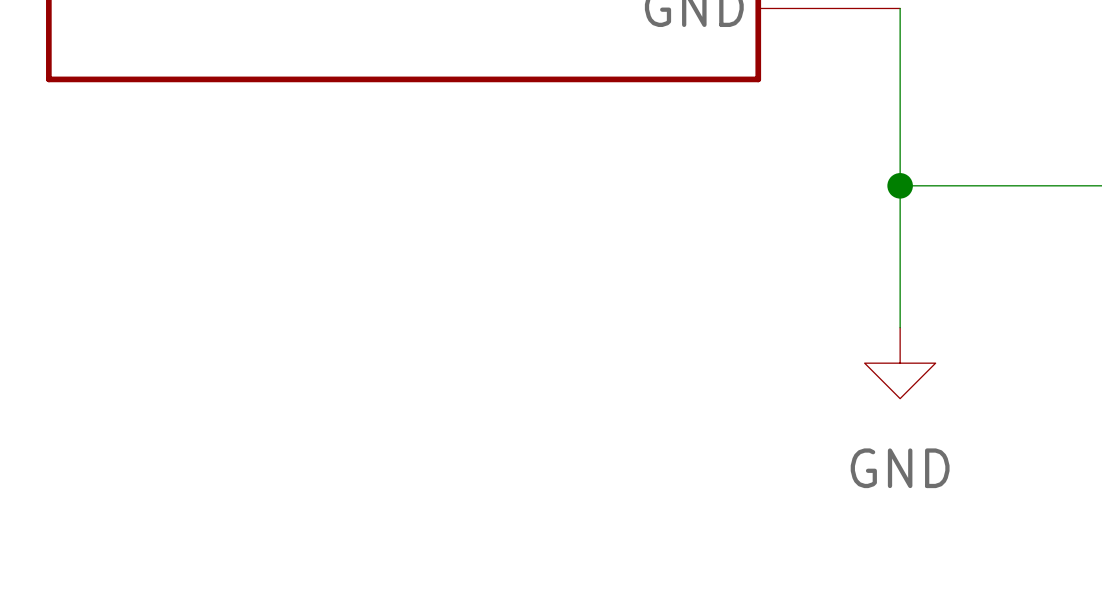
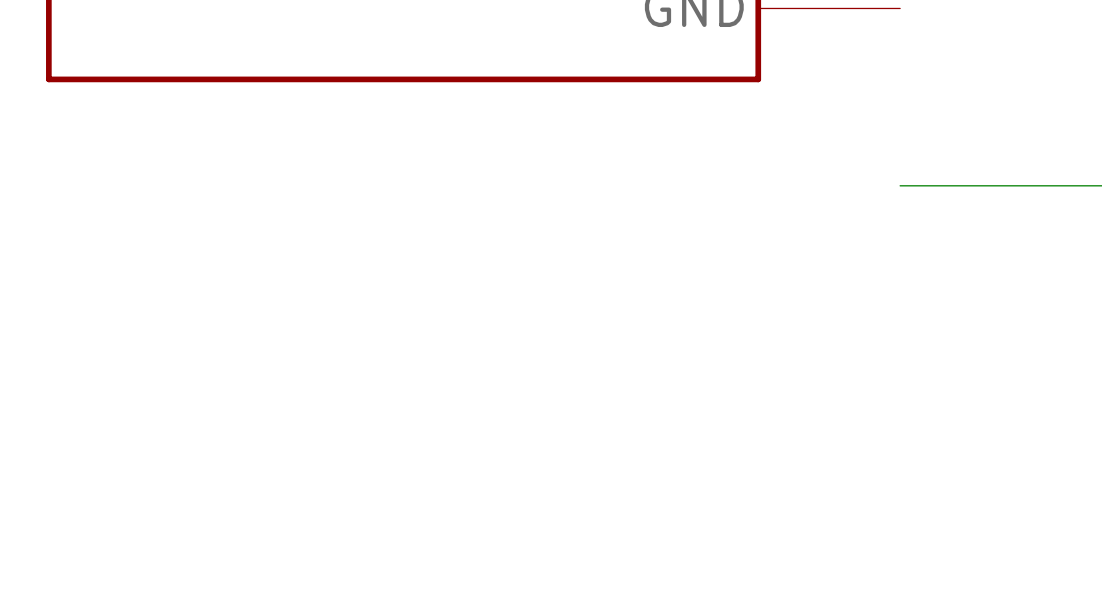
wire: (900, 8) (900, 327) -> none
junction: (900, 185) -> none
power symbol: GND (900, 363) -> none

